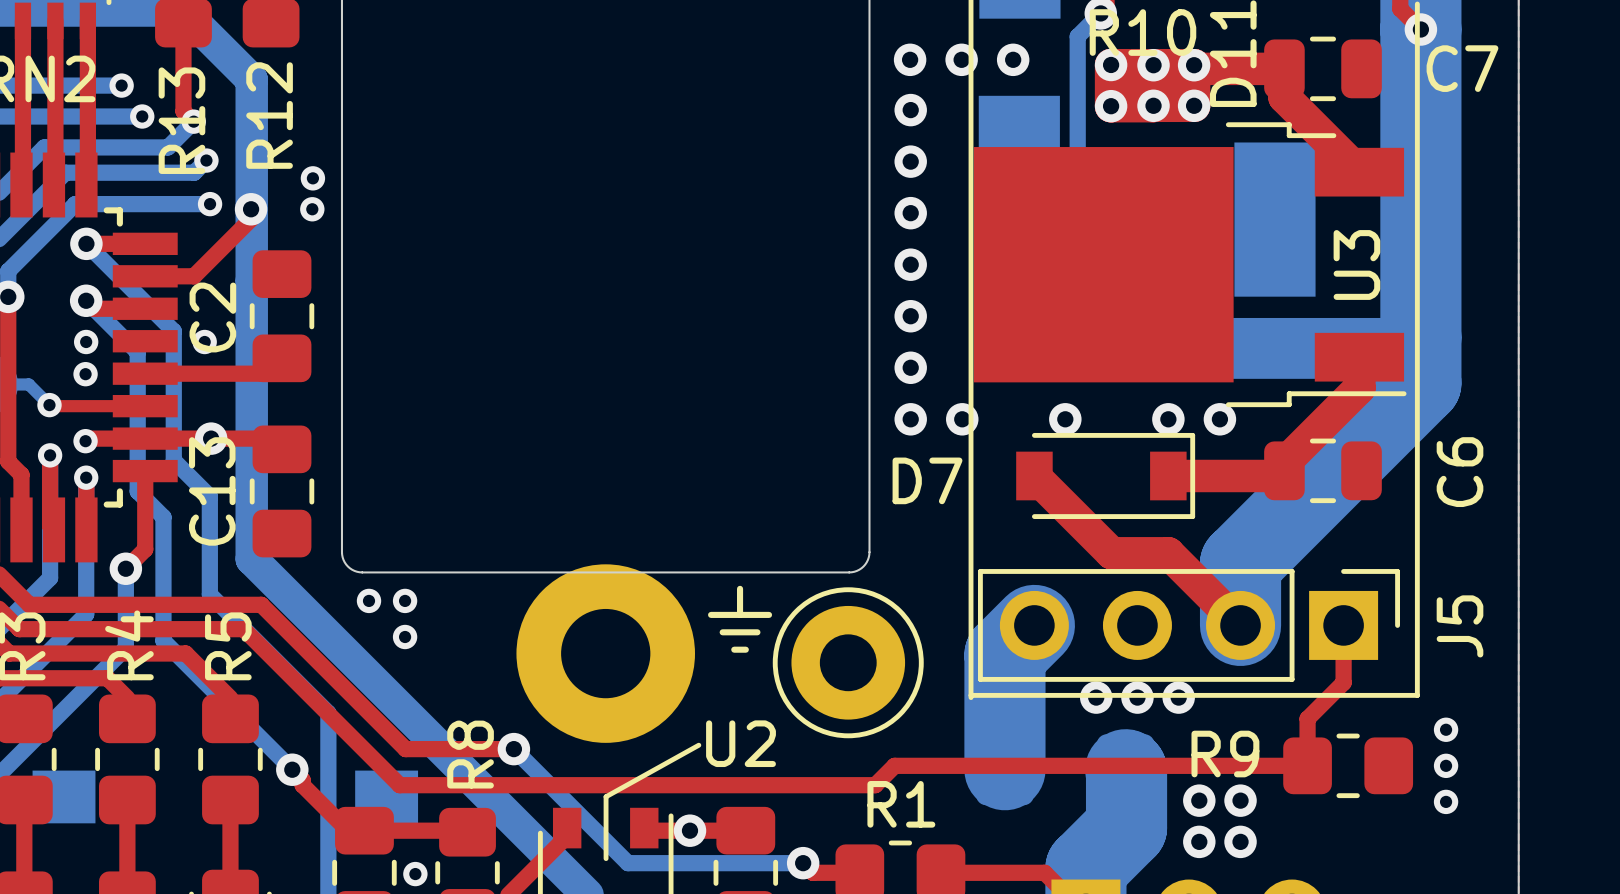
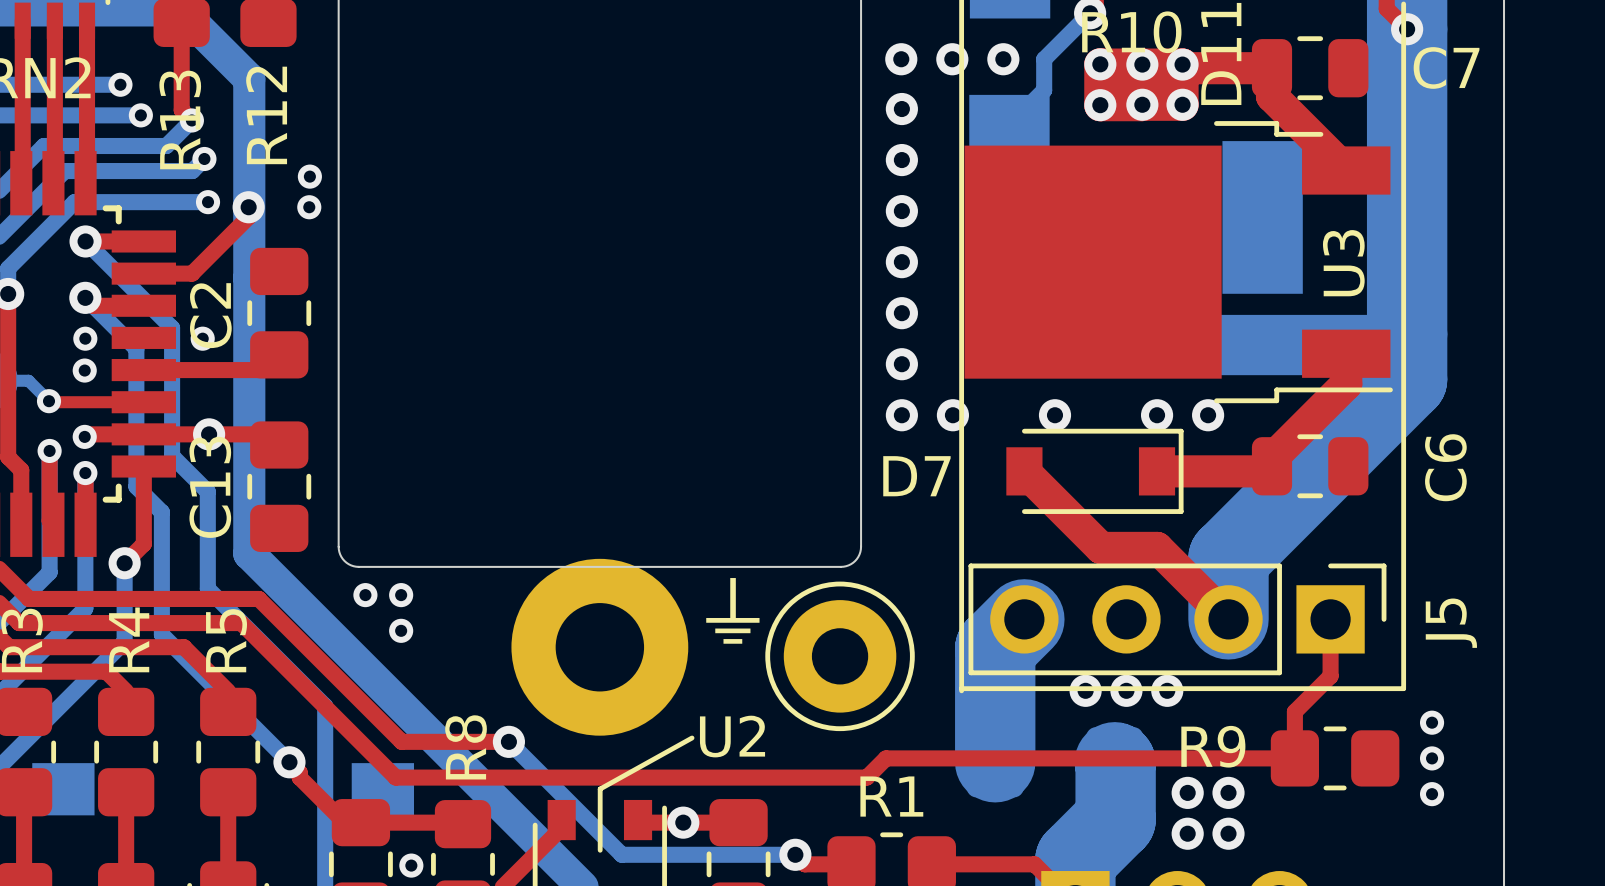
bottom track: (1077, 36) (1077, 218) (1076, 219) -> (1067, 36) (1044, 59) (1044, 90) (1009, 125)

